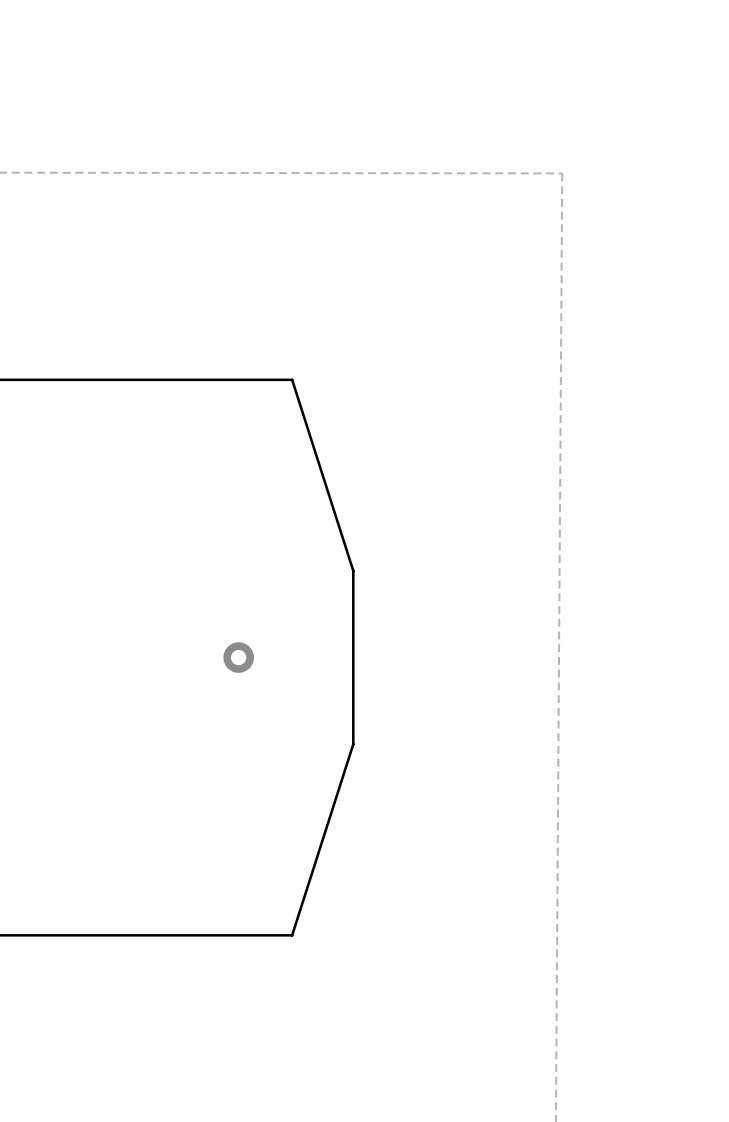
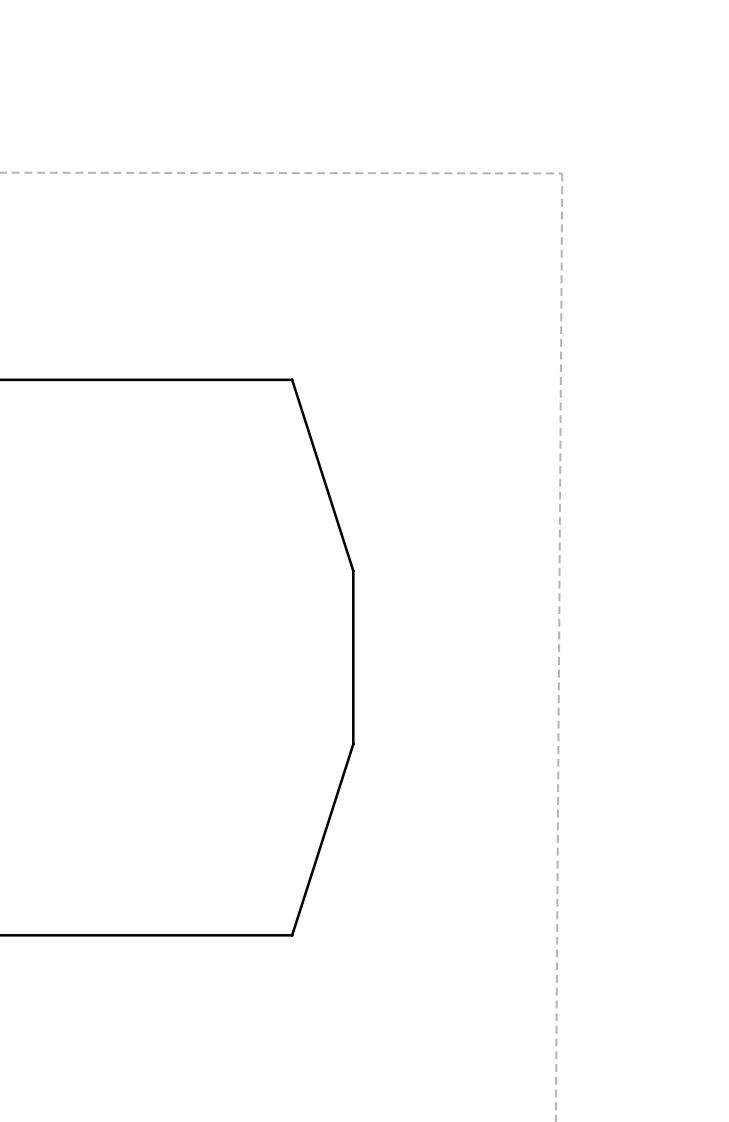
via: (238, 657) -> none

